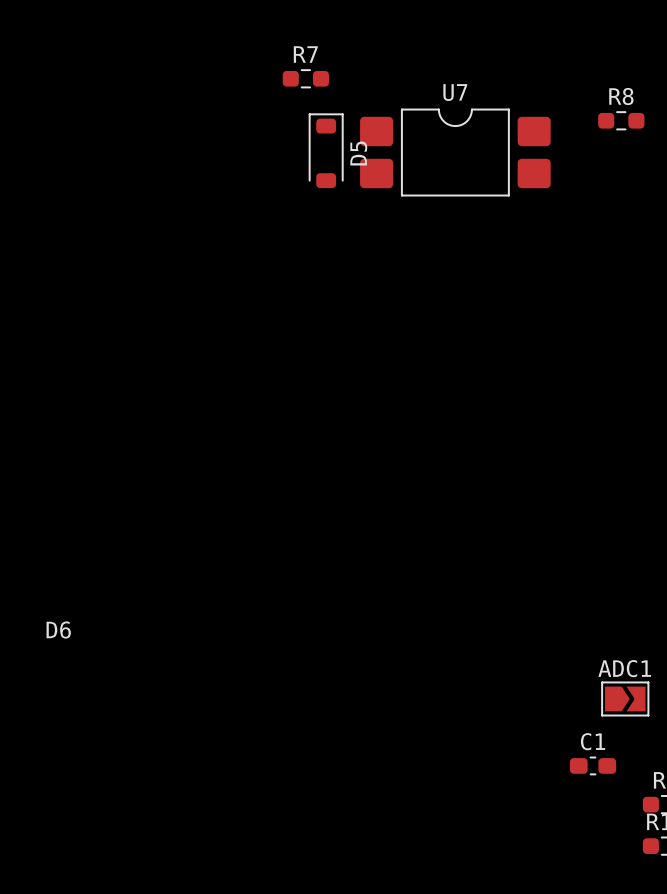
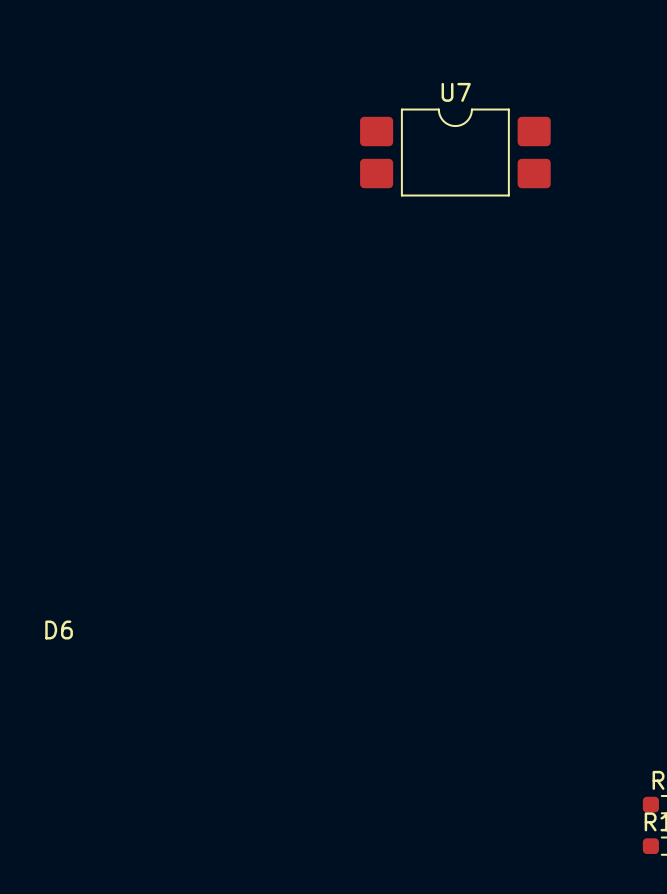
R7: (305, 78) -> none
R8: (621, 120) -> none
D5: (326, 150) -> none
ADC1: (625, 698) -> none
C1: (593, 765) -> none

